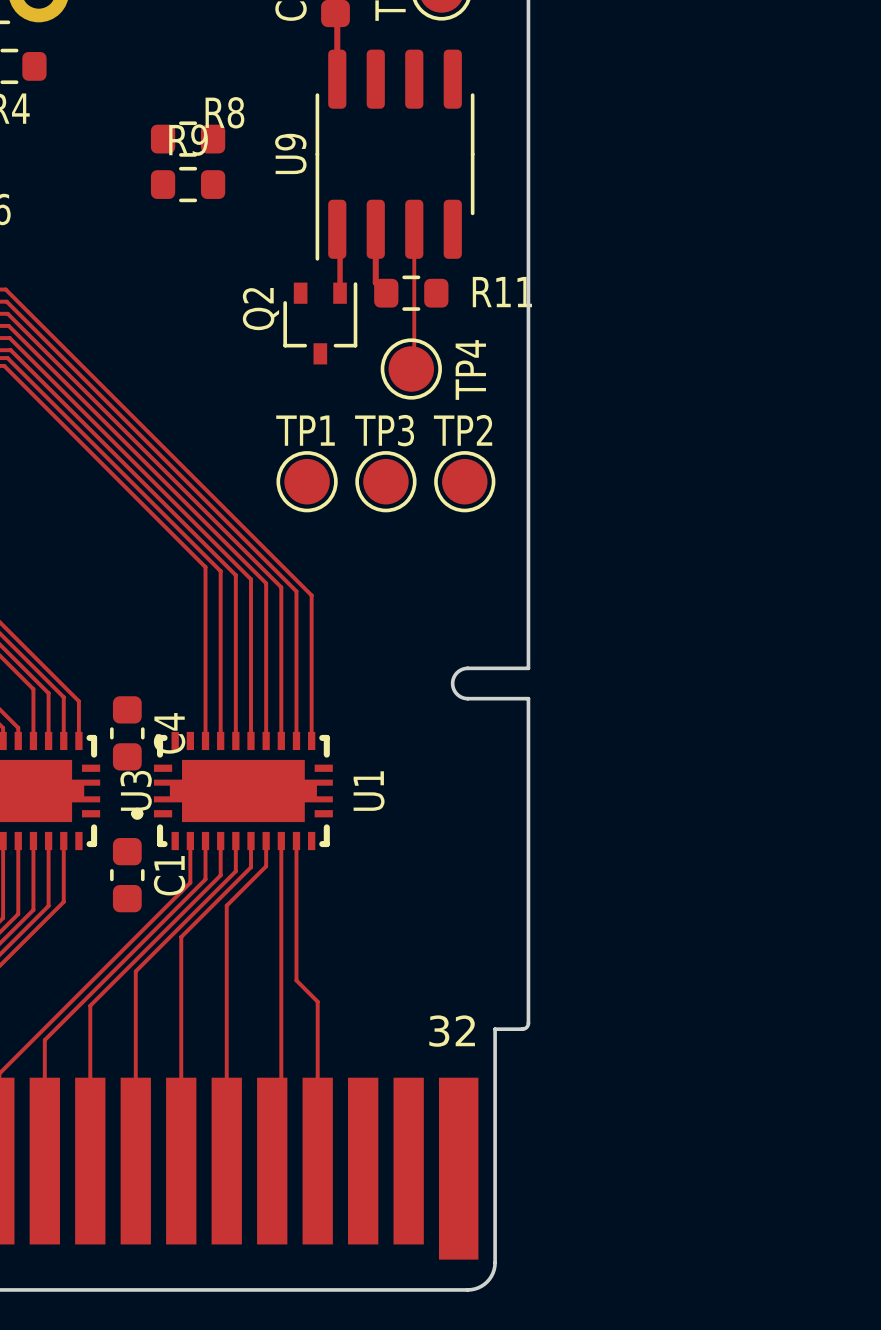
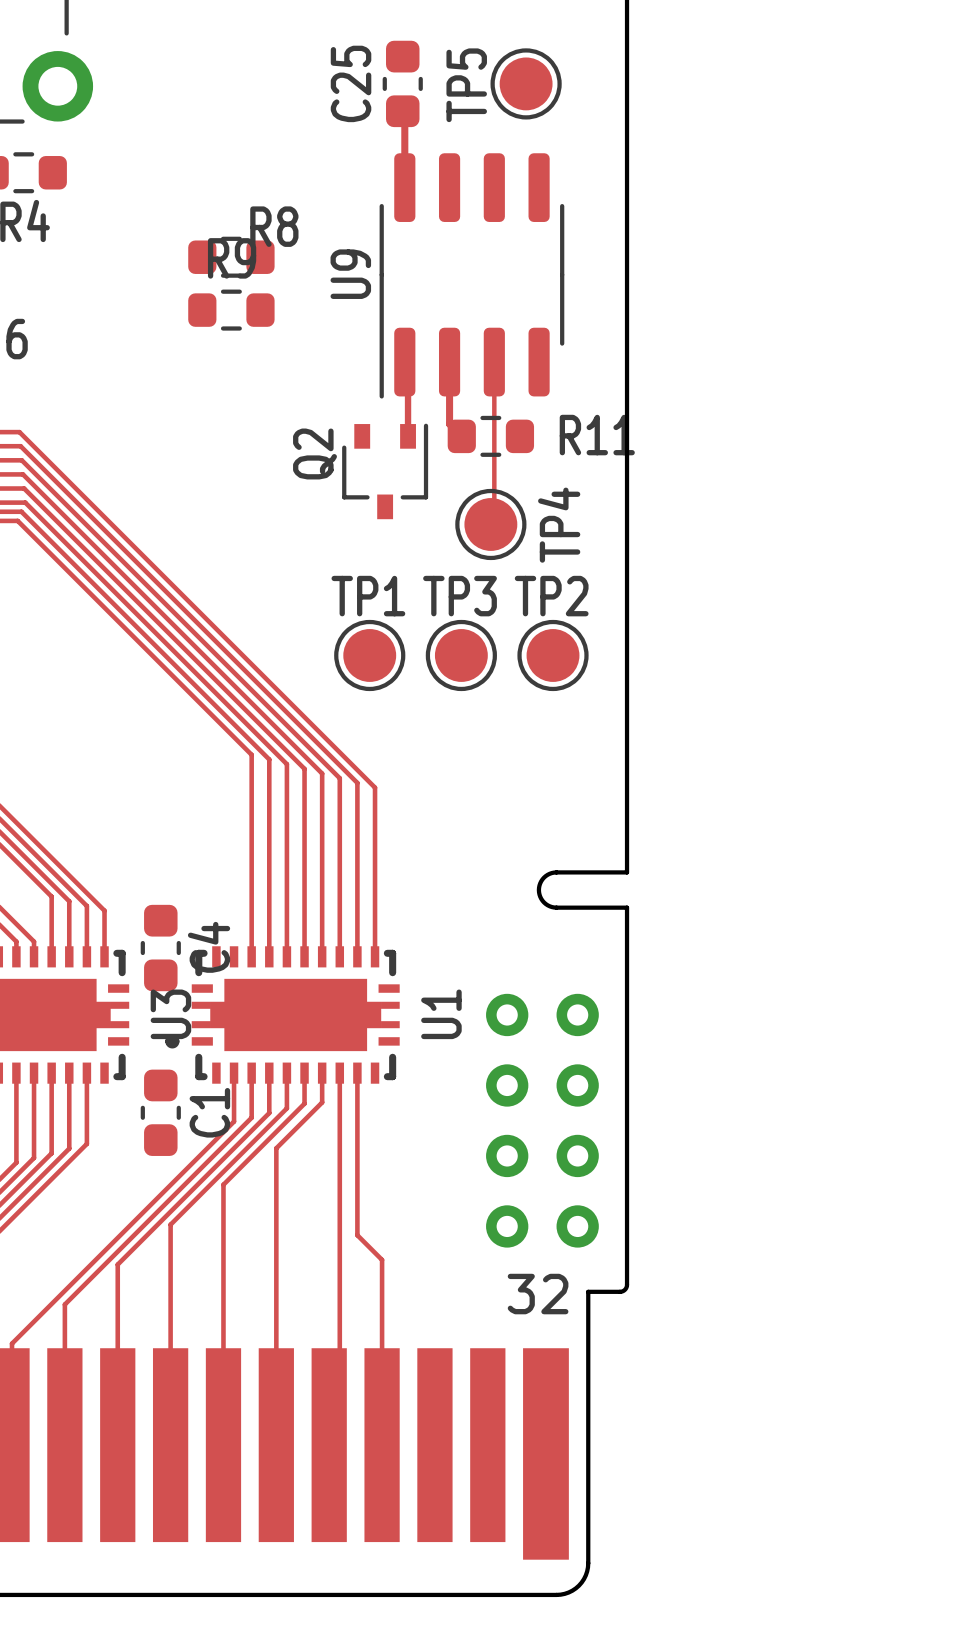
via: none -> (507, 1014)
via: none -> (577, 1014)
via: none -> (507, 1085)
via: none -> (577, 1085)
via: none -> (507, 1155)
via: none -> (577, 1155)
via: none -> (507, 1226)
via: none -> (577, 1226)

